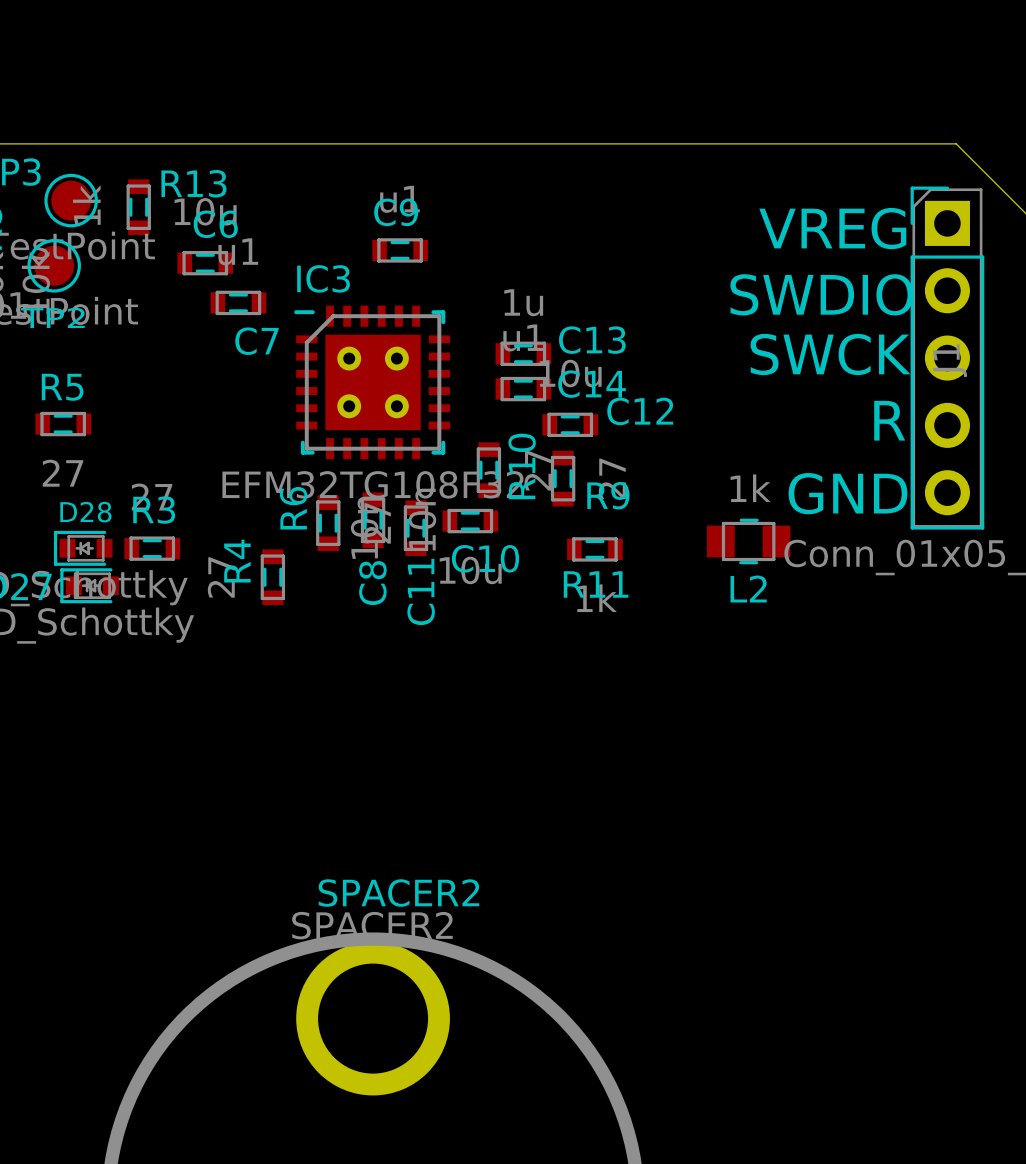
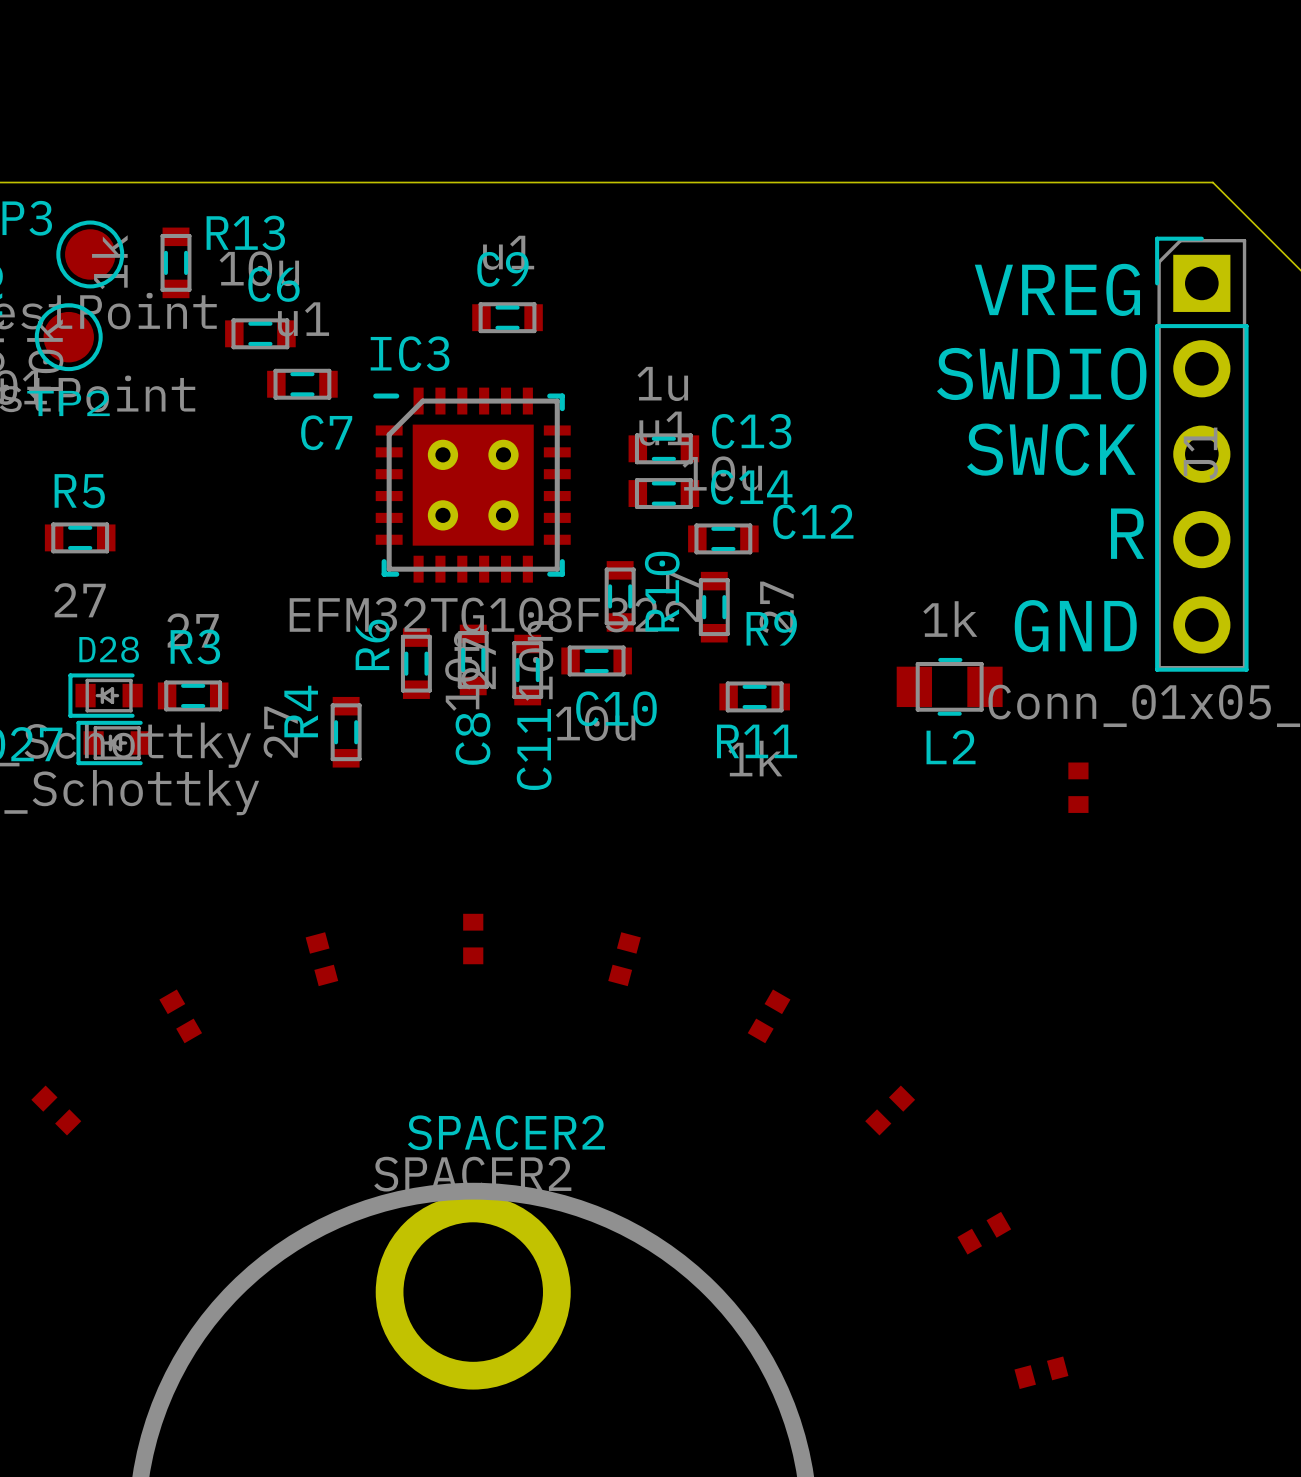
part: none -> (1078, 787)
part: none -> (473, 939)
part: none -> (321, 959)
part: none -> (624, 959)
part: none -> (180, 1016)
part: none -> (769, 1016)
part: none -> (56, 1110)
part: none -> (890, 1110)
part: none -> (984, 1233)
part: none -> (1041, 1372)

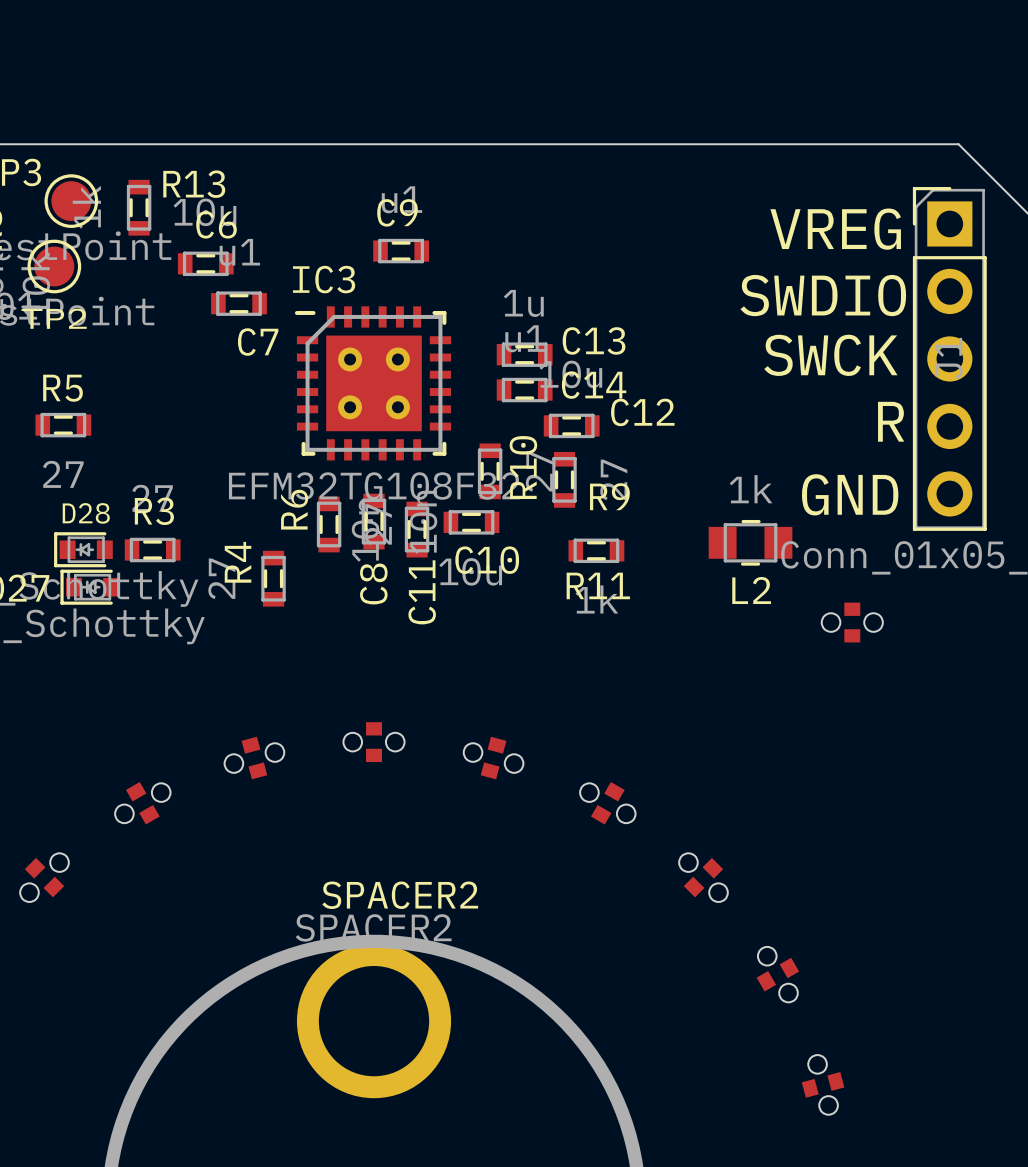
part footprint: [1068, 762, 1089, 813] -> [821, 602, 883, 643]
part footprint: [463, 913, 484, 965] -> [343, 722, 405, 763]
part footprint: [305, 932, 339, 987] -> [224, 736, 285, 780]
part footprint: [608, 932, 641, 987] -> [463, 736, 524, 780]
part footprint: [159, 989, 203, 1044] -> [115, 781, 171, 825]
part footprint: [747, 989, 791, 1044] -> [580, 781, 636, 825]
part footprint: [31, 1085, 82, 1136] -> [20, 853, 69, 902]
part footprint: [865, 1085, 916, 1136] -> [679, 853, 728, 902]
part footprint: [957, 1211, 1012, 1255] -> [756, 946, 800, 1003]
part footprint: [1014, 1356, 1069, 1390] -> [801, 1055, 845, 1115]

